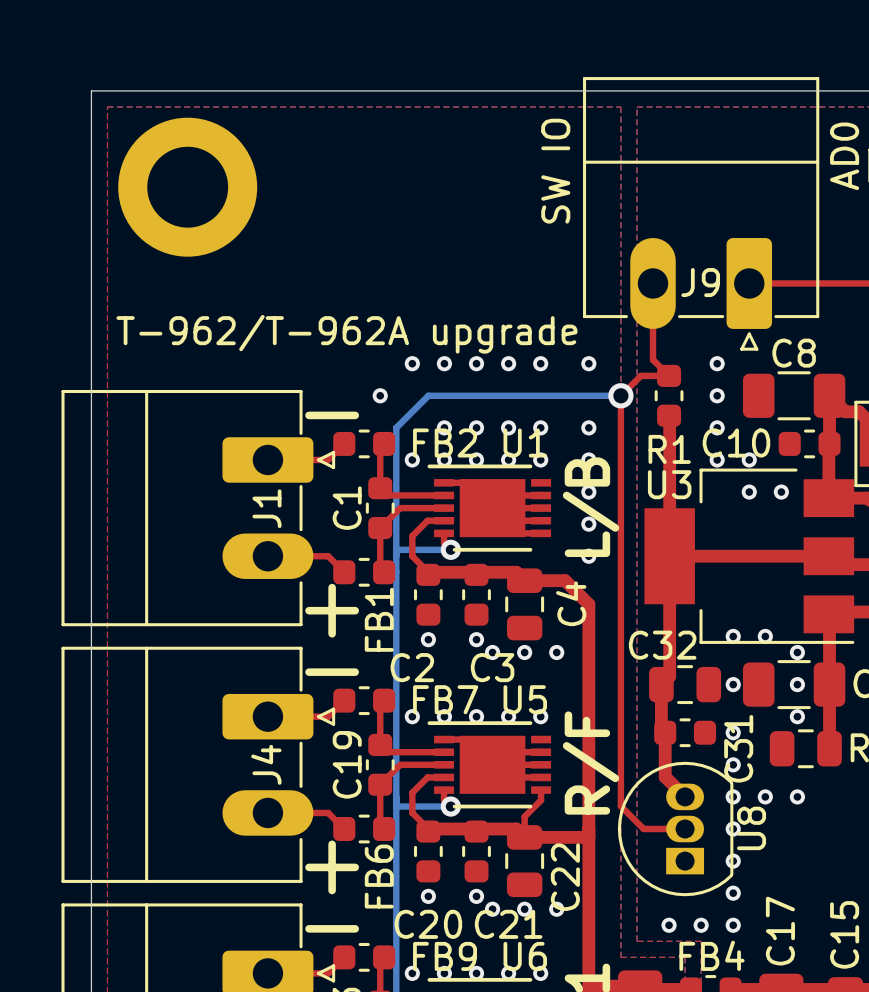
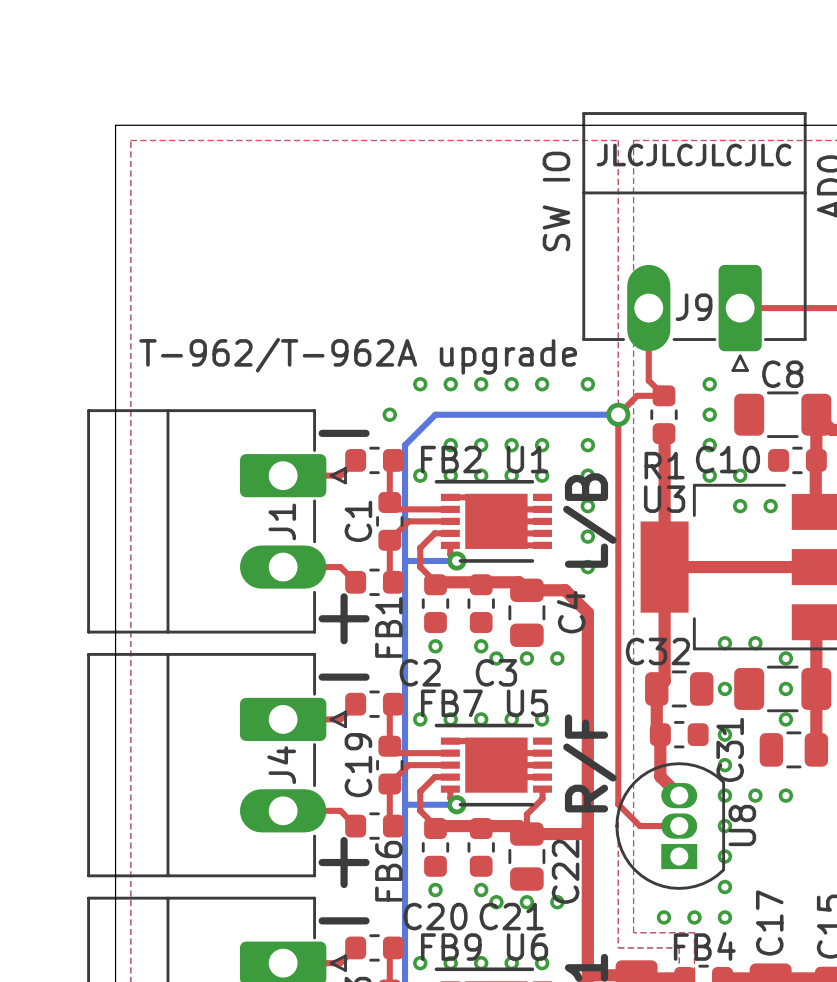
text: none -> JLCJLCJLCJLC (694, 155)
part: (187, 187) -> none

